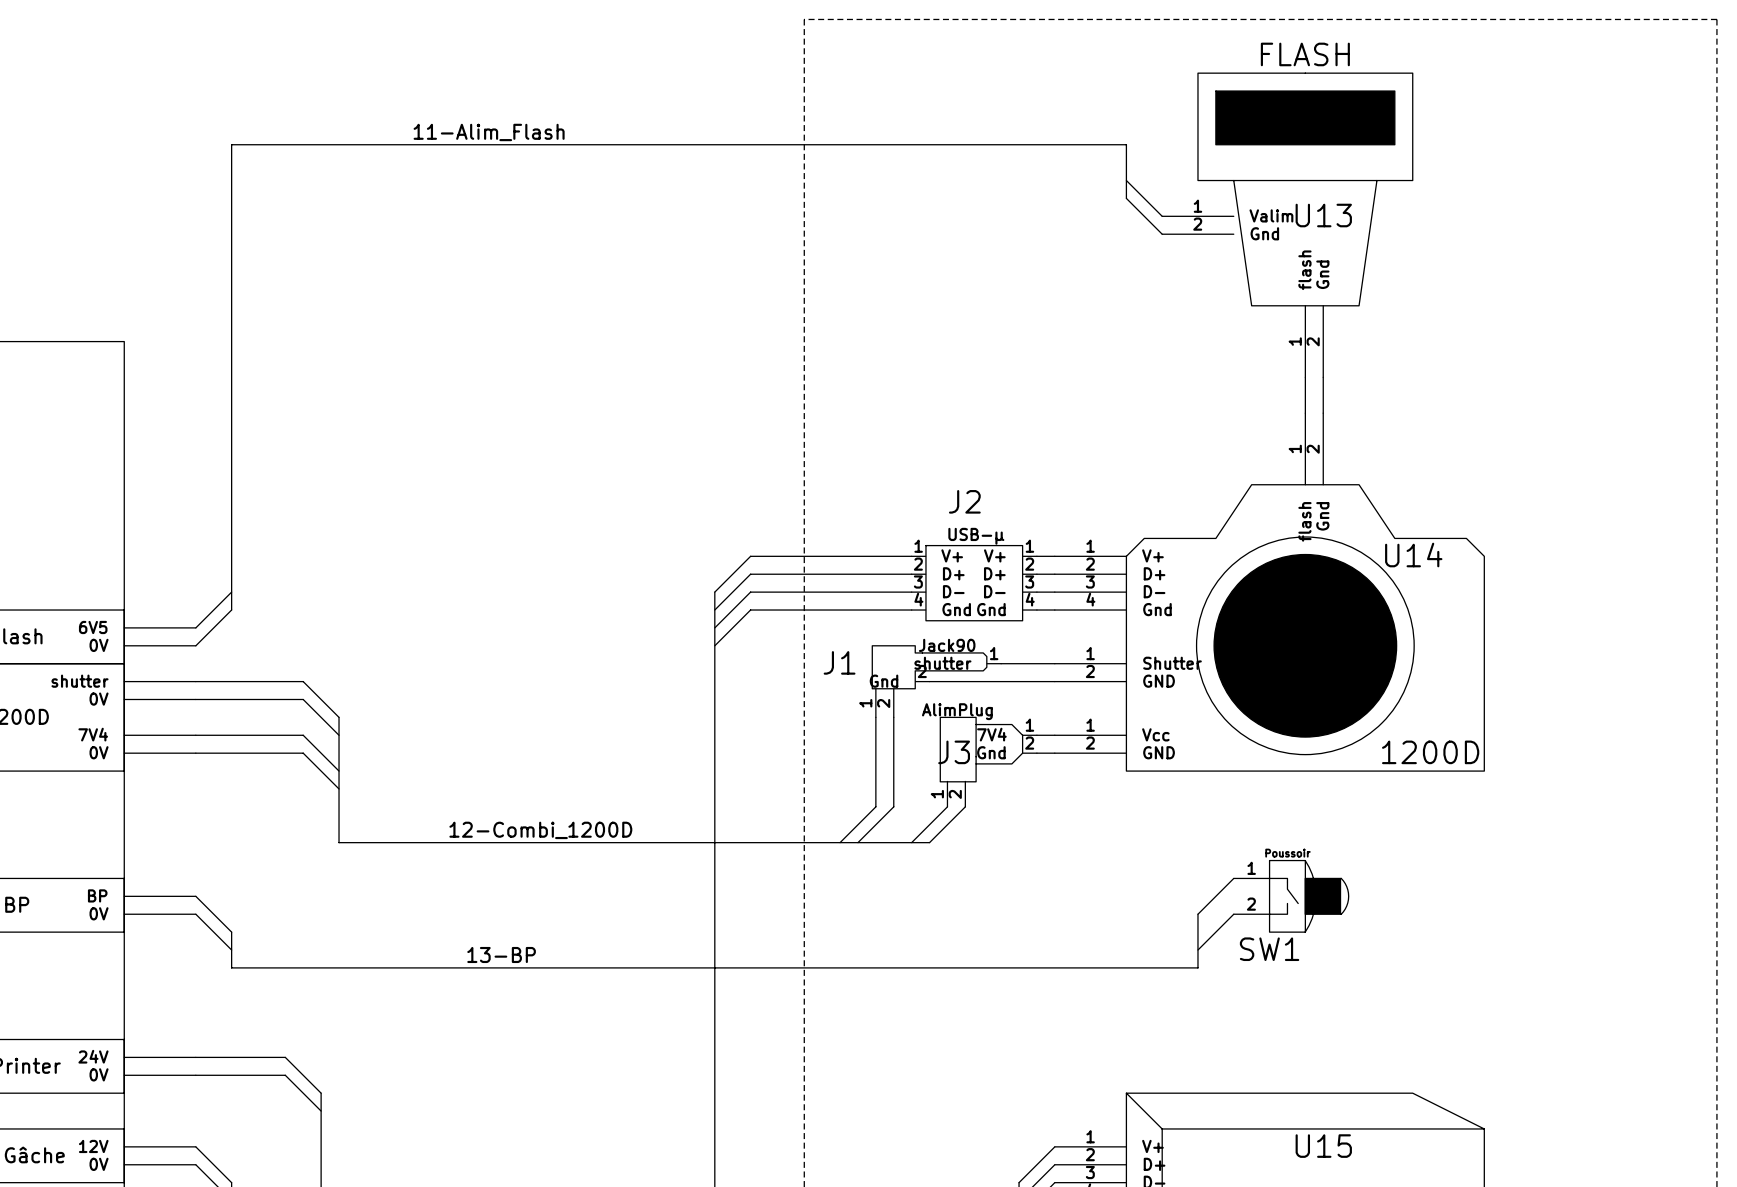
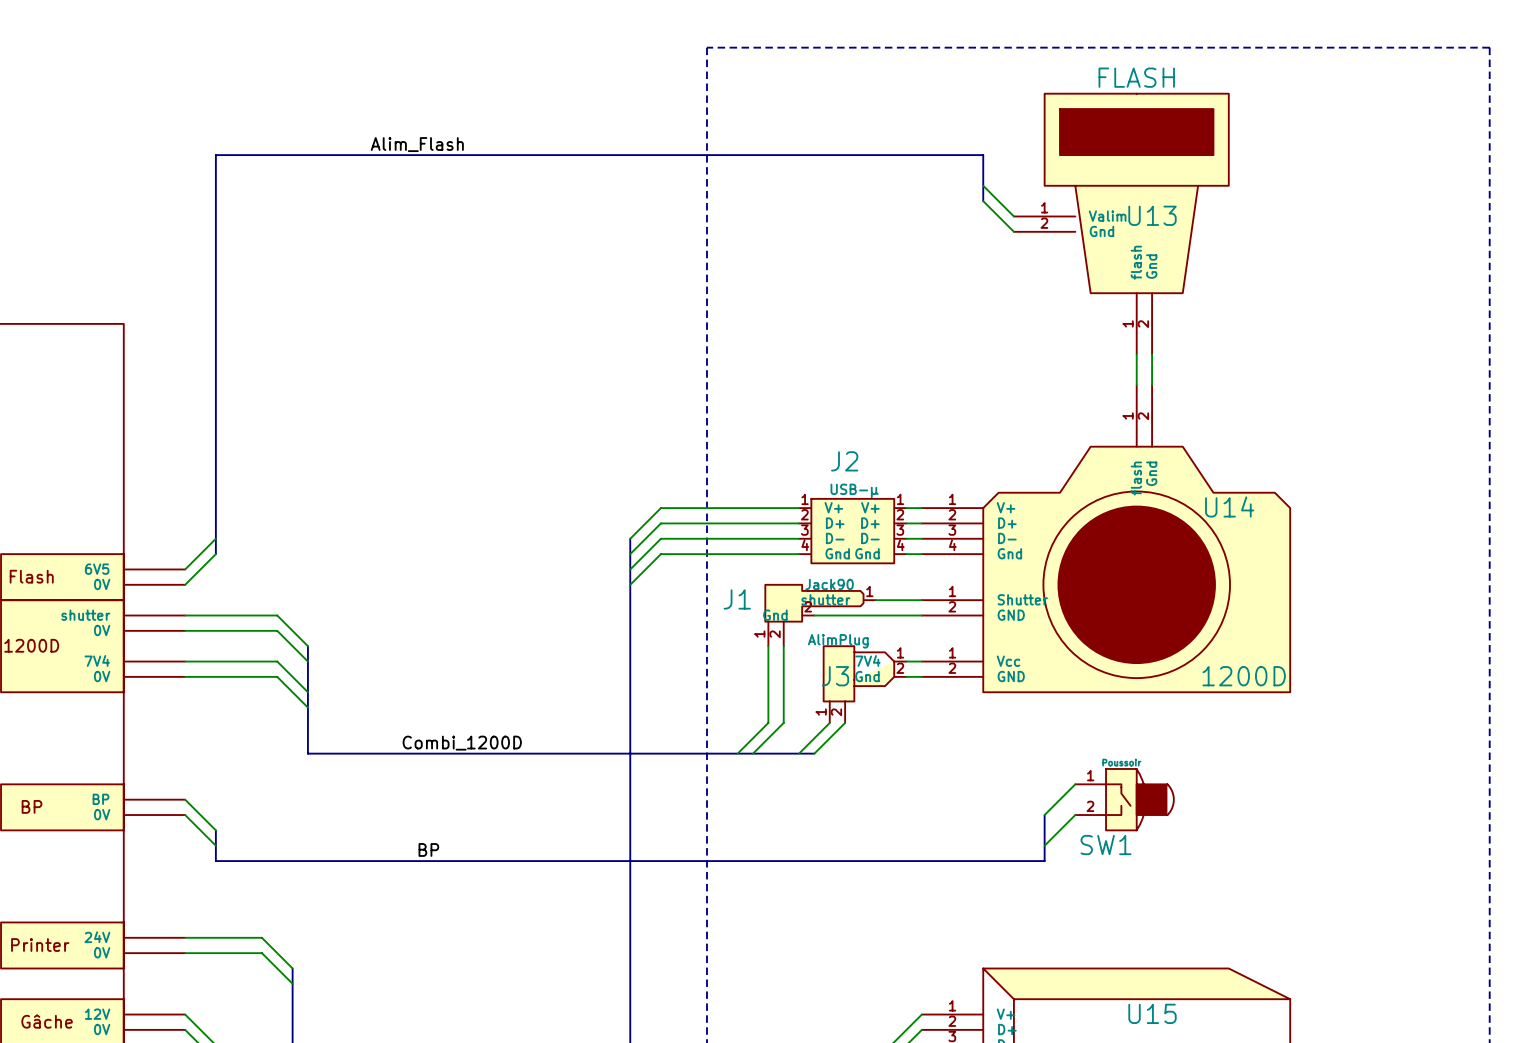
label: 11-Alim_Flash (489, 132) -> Alim_Flash (417, 144)
label: 12-Combi_1200D (540, 830) -> Combi_1200D (462, 743)
label: 13-BP (501, 954) -> BP (428, 849)

